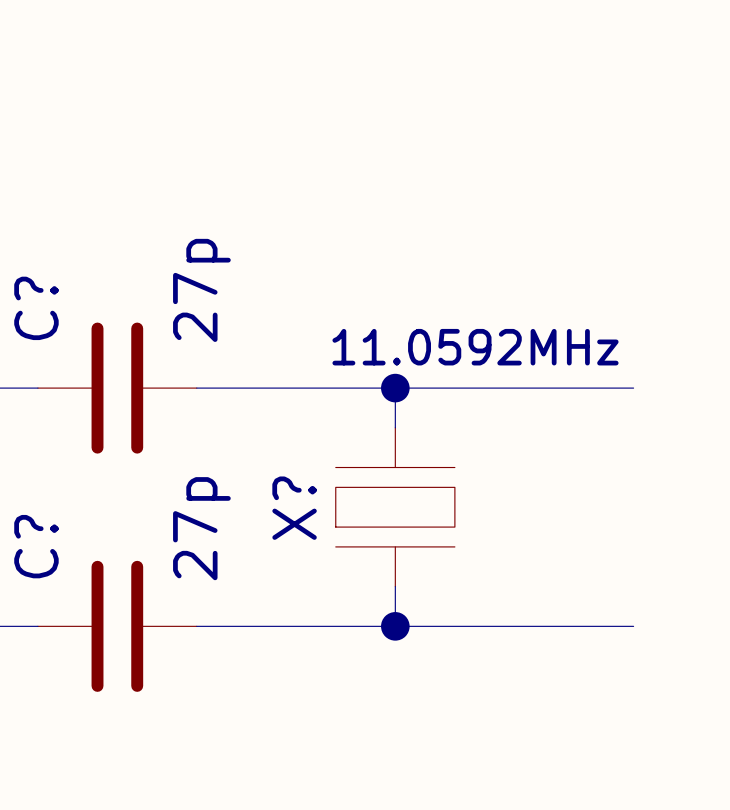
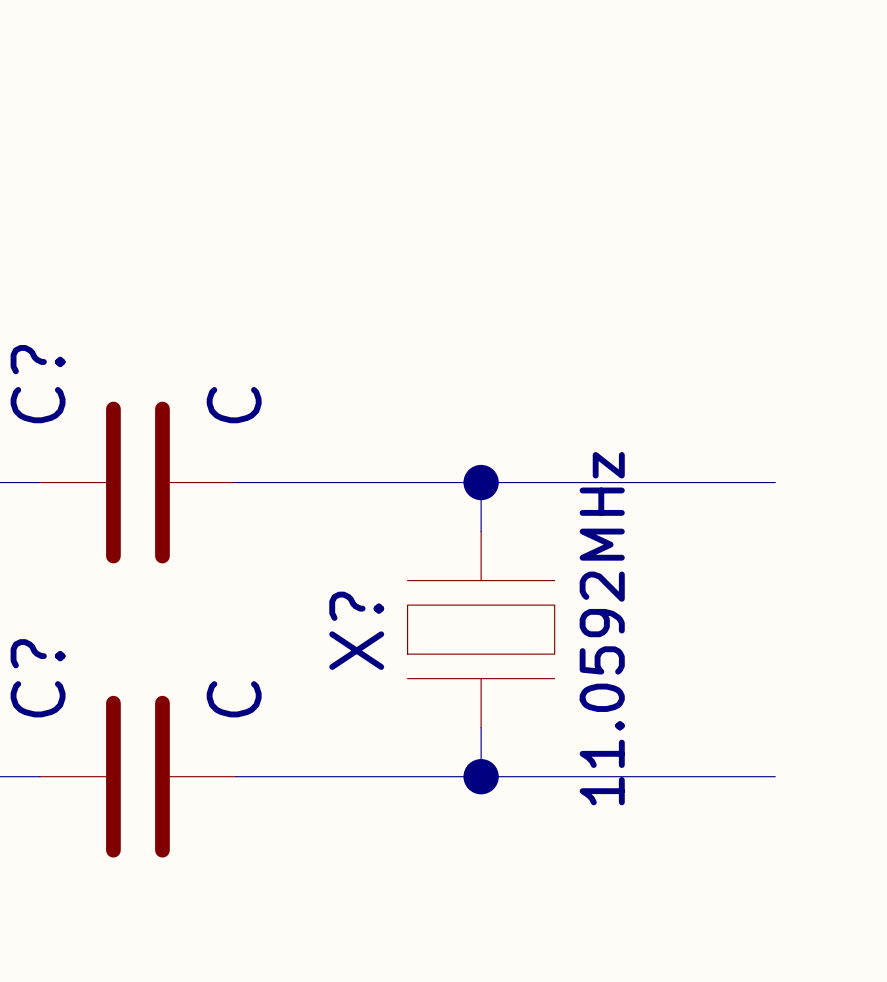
C? value: 27p (201, 290) -> C (234, 405)
X? value rotation: 0° (475, 347) -> 90° counterclockwise (602, 628)
C? value: 27p (201, 528) -> C (234, 699)

